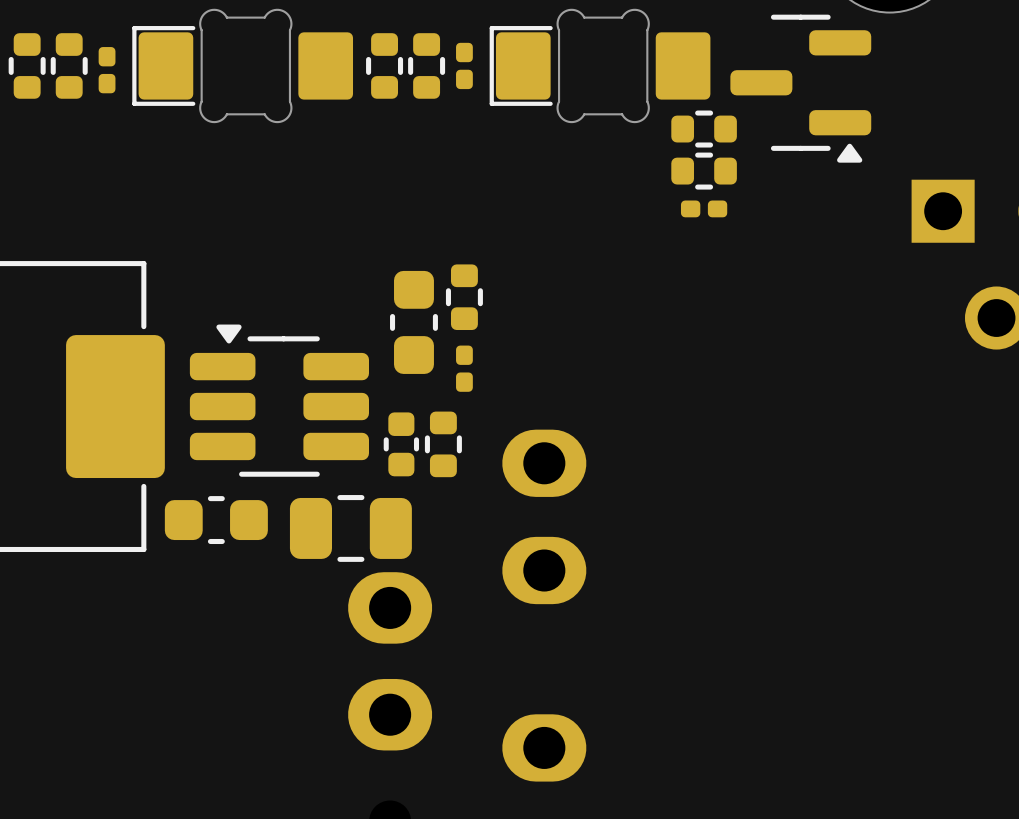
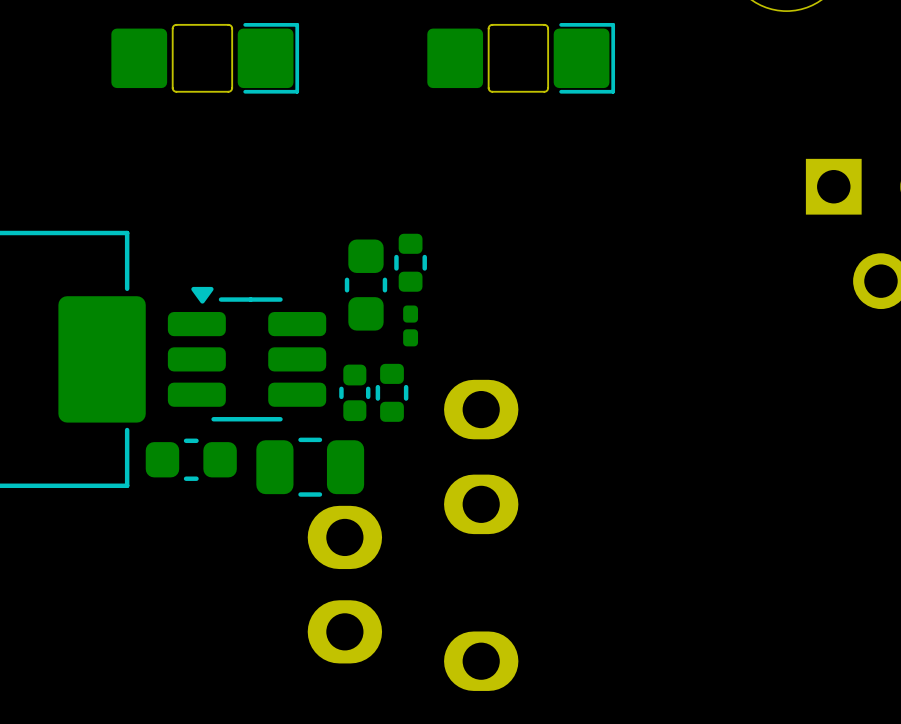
part footprint: [132, 8, 354, 124] -> [111, 23, 300, 94]
part footprint: [489, 8, 711, 124] -> [427, 23, 616, 94]
part: (27, 65) -> none
part: (69, 65) -> none
part: (384, 65) -> none
part: (426, 65) -> none
part: (464, 65) -> none
part: (107, 70) -> none
part: (800, 88) -> none
part: (704, 129) -> none
part: (704, 171) -> none
part: (704, 208) -> none

